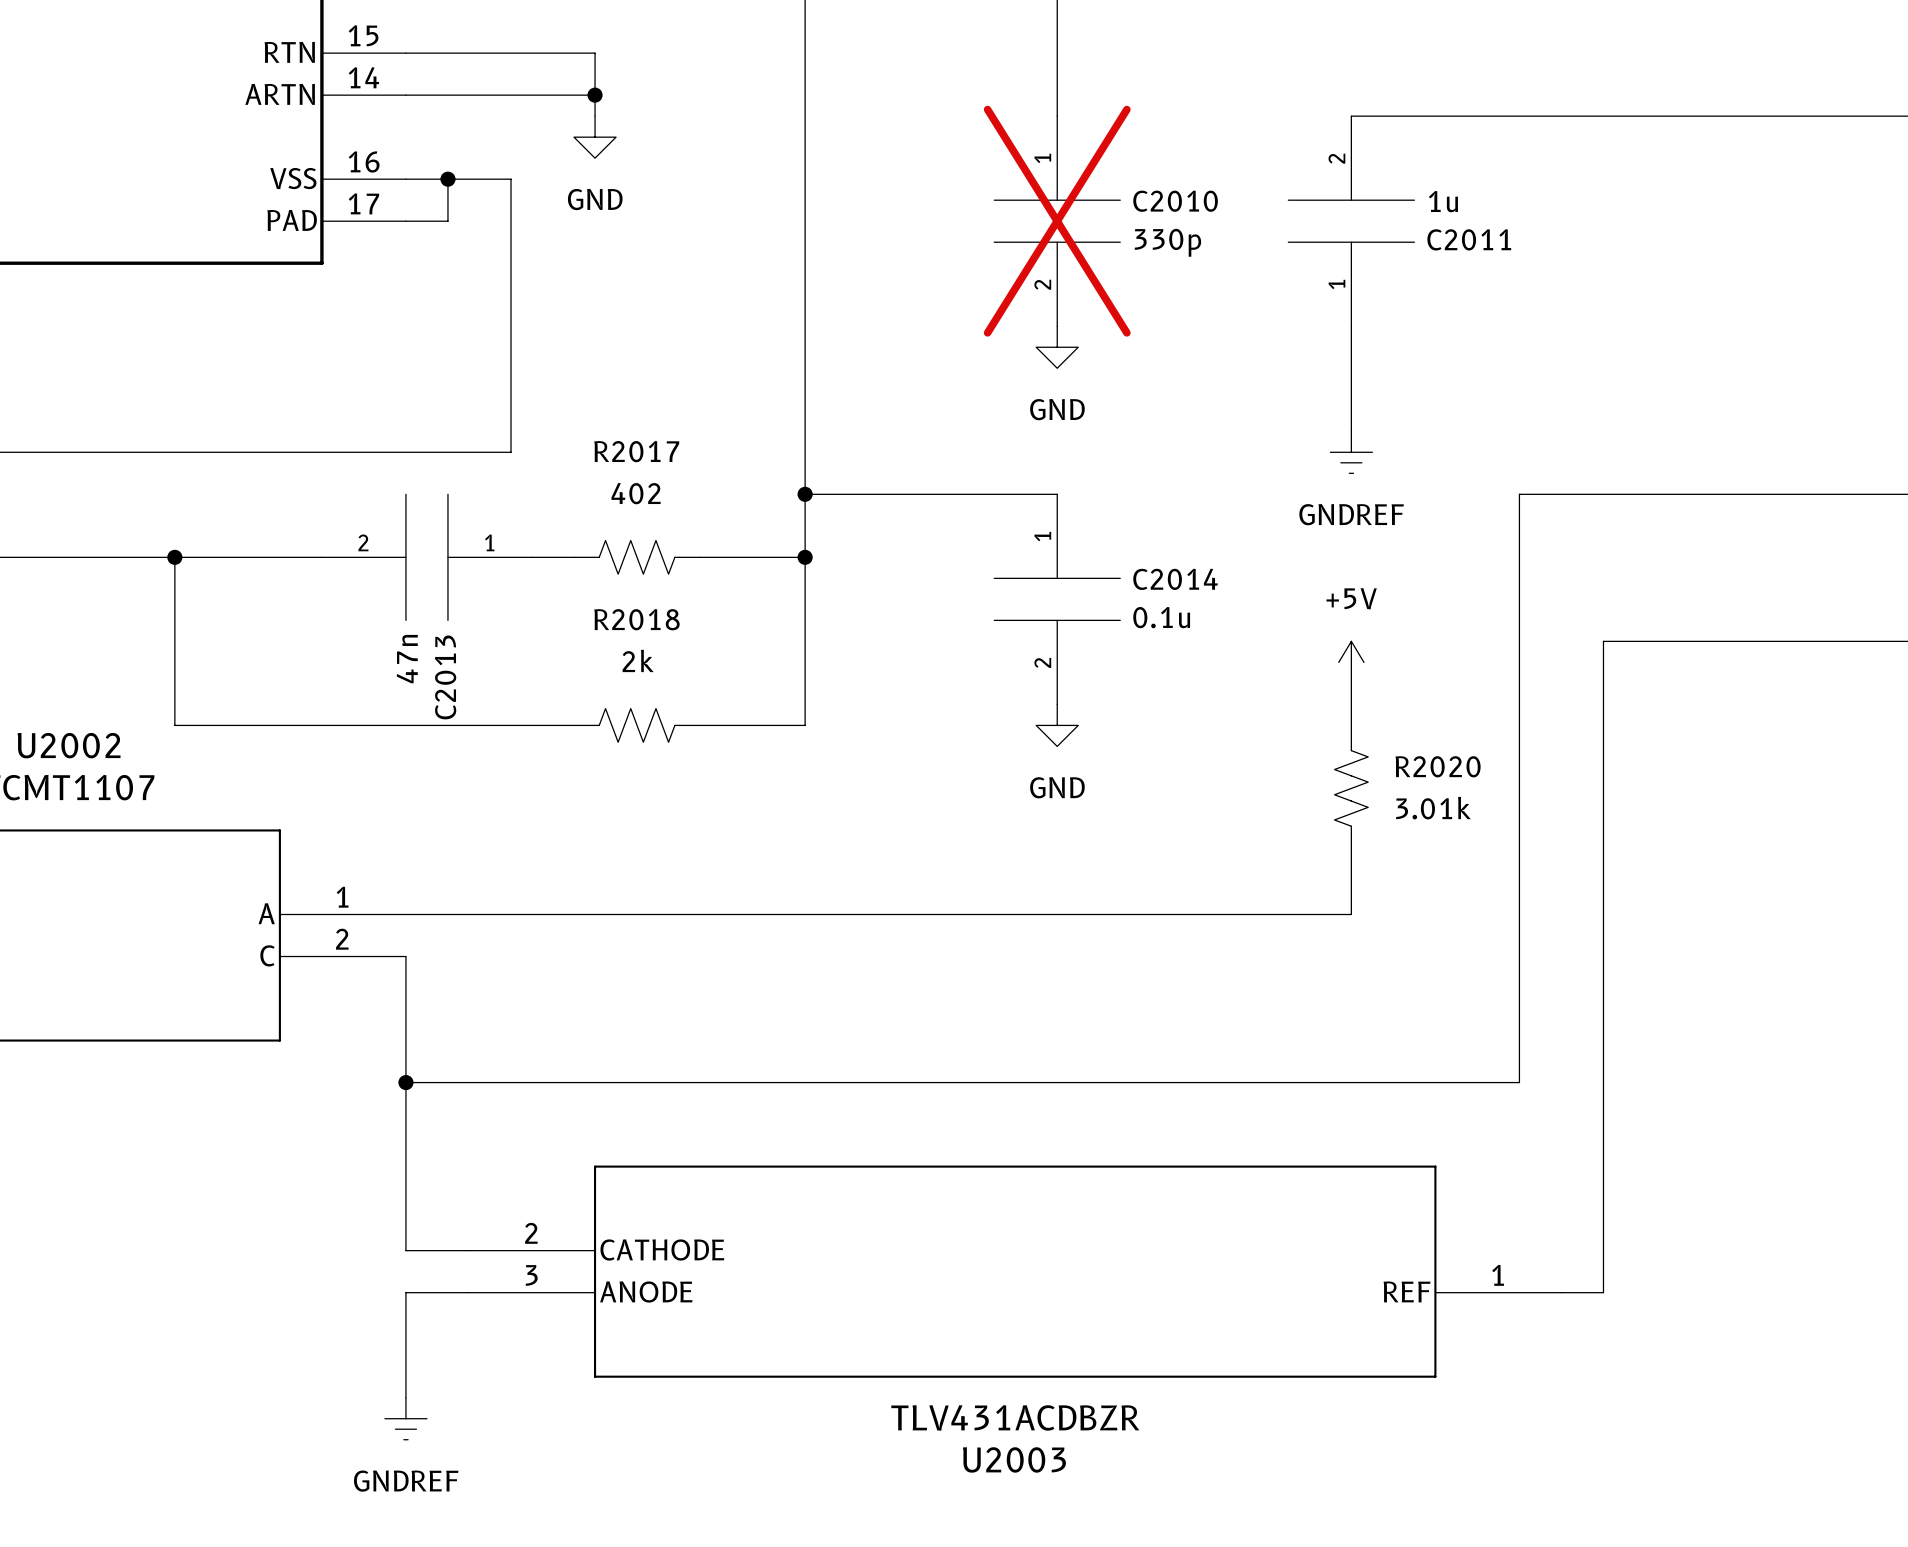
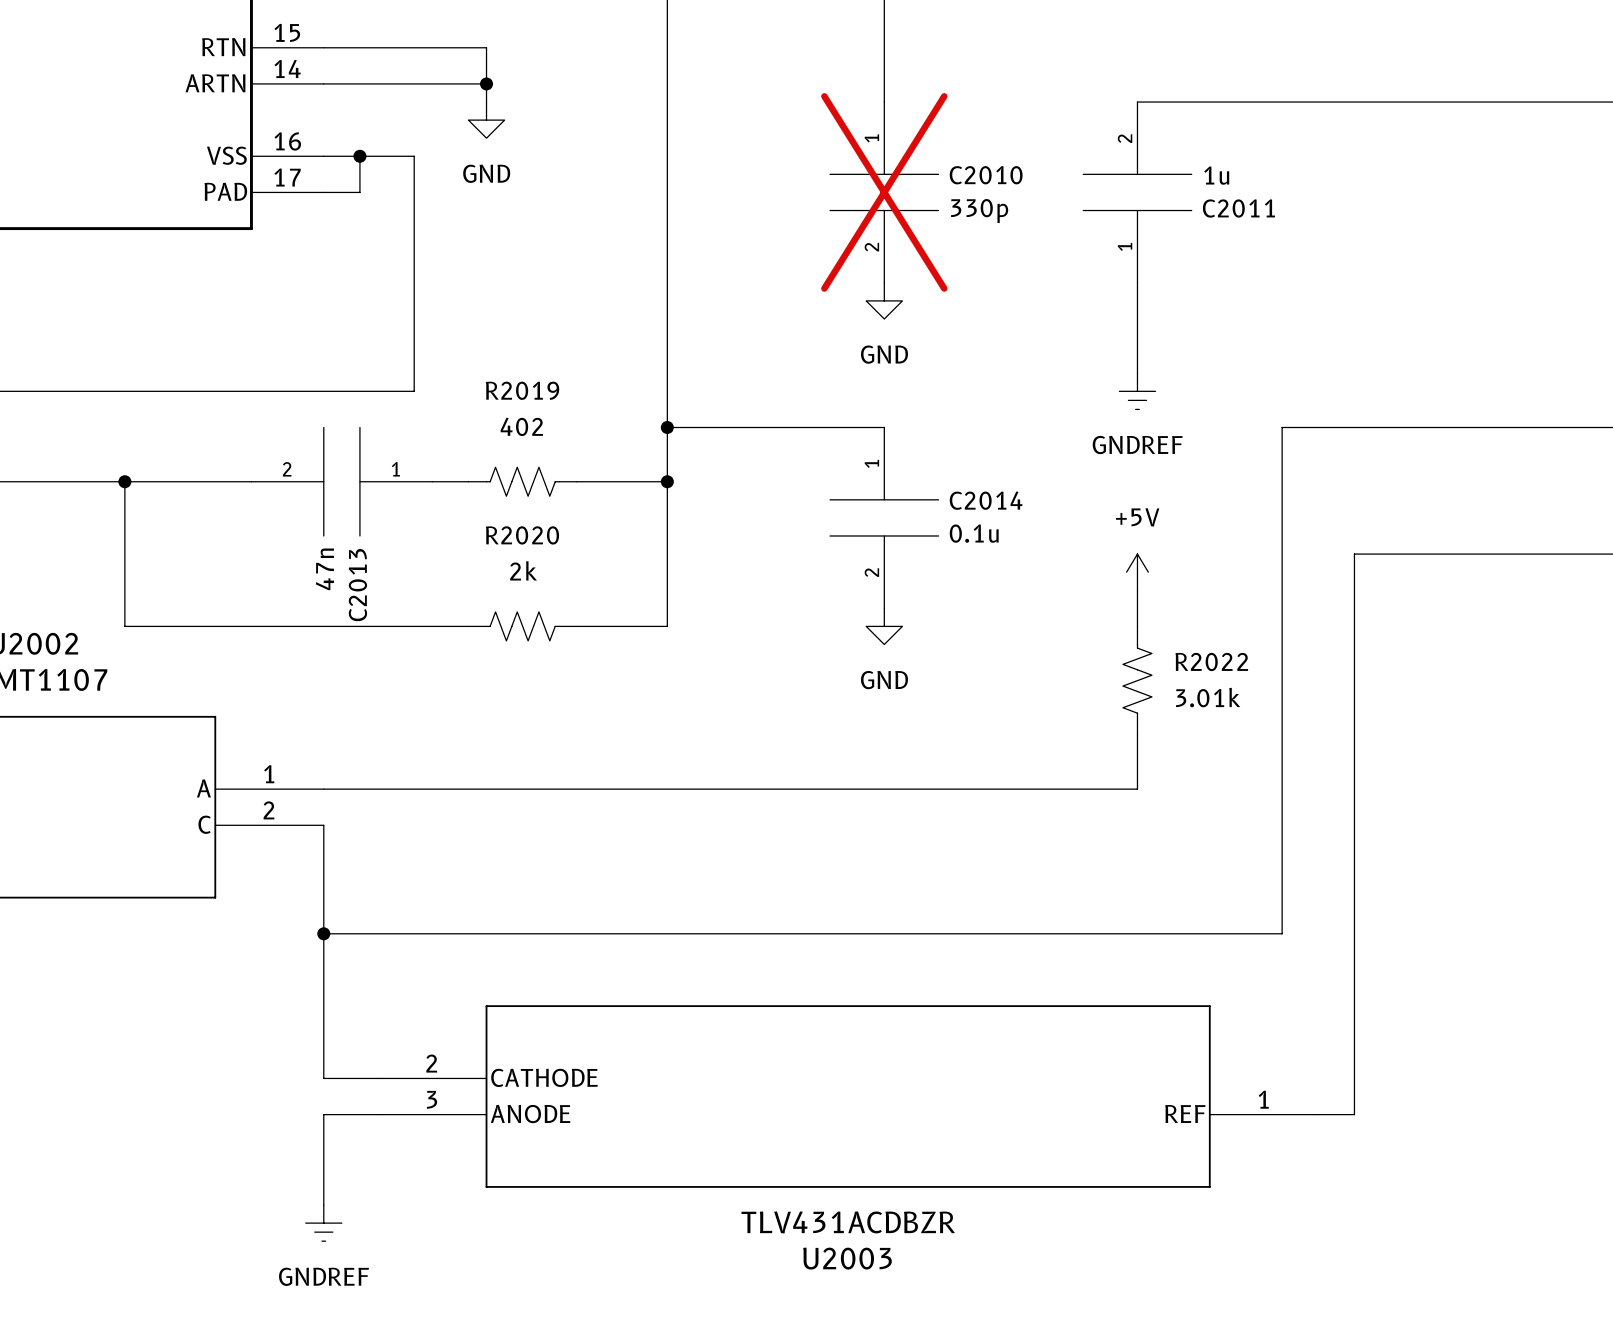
R2017 name: R2017 (636, 451) -> R2019 (522, 390)
R2018 name: R2018 (636, 619) -> R2020 (522, 535)
R2020 name: R2020 (1438, 766) -> R2022 (1211, 662)

